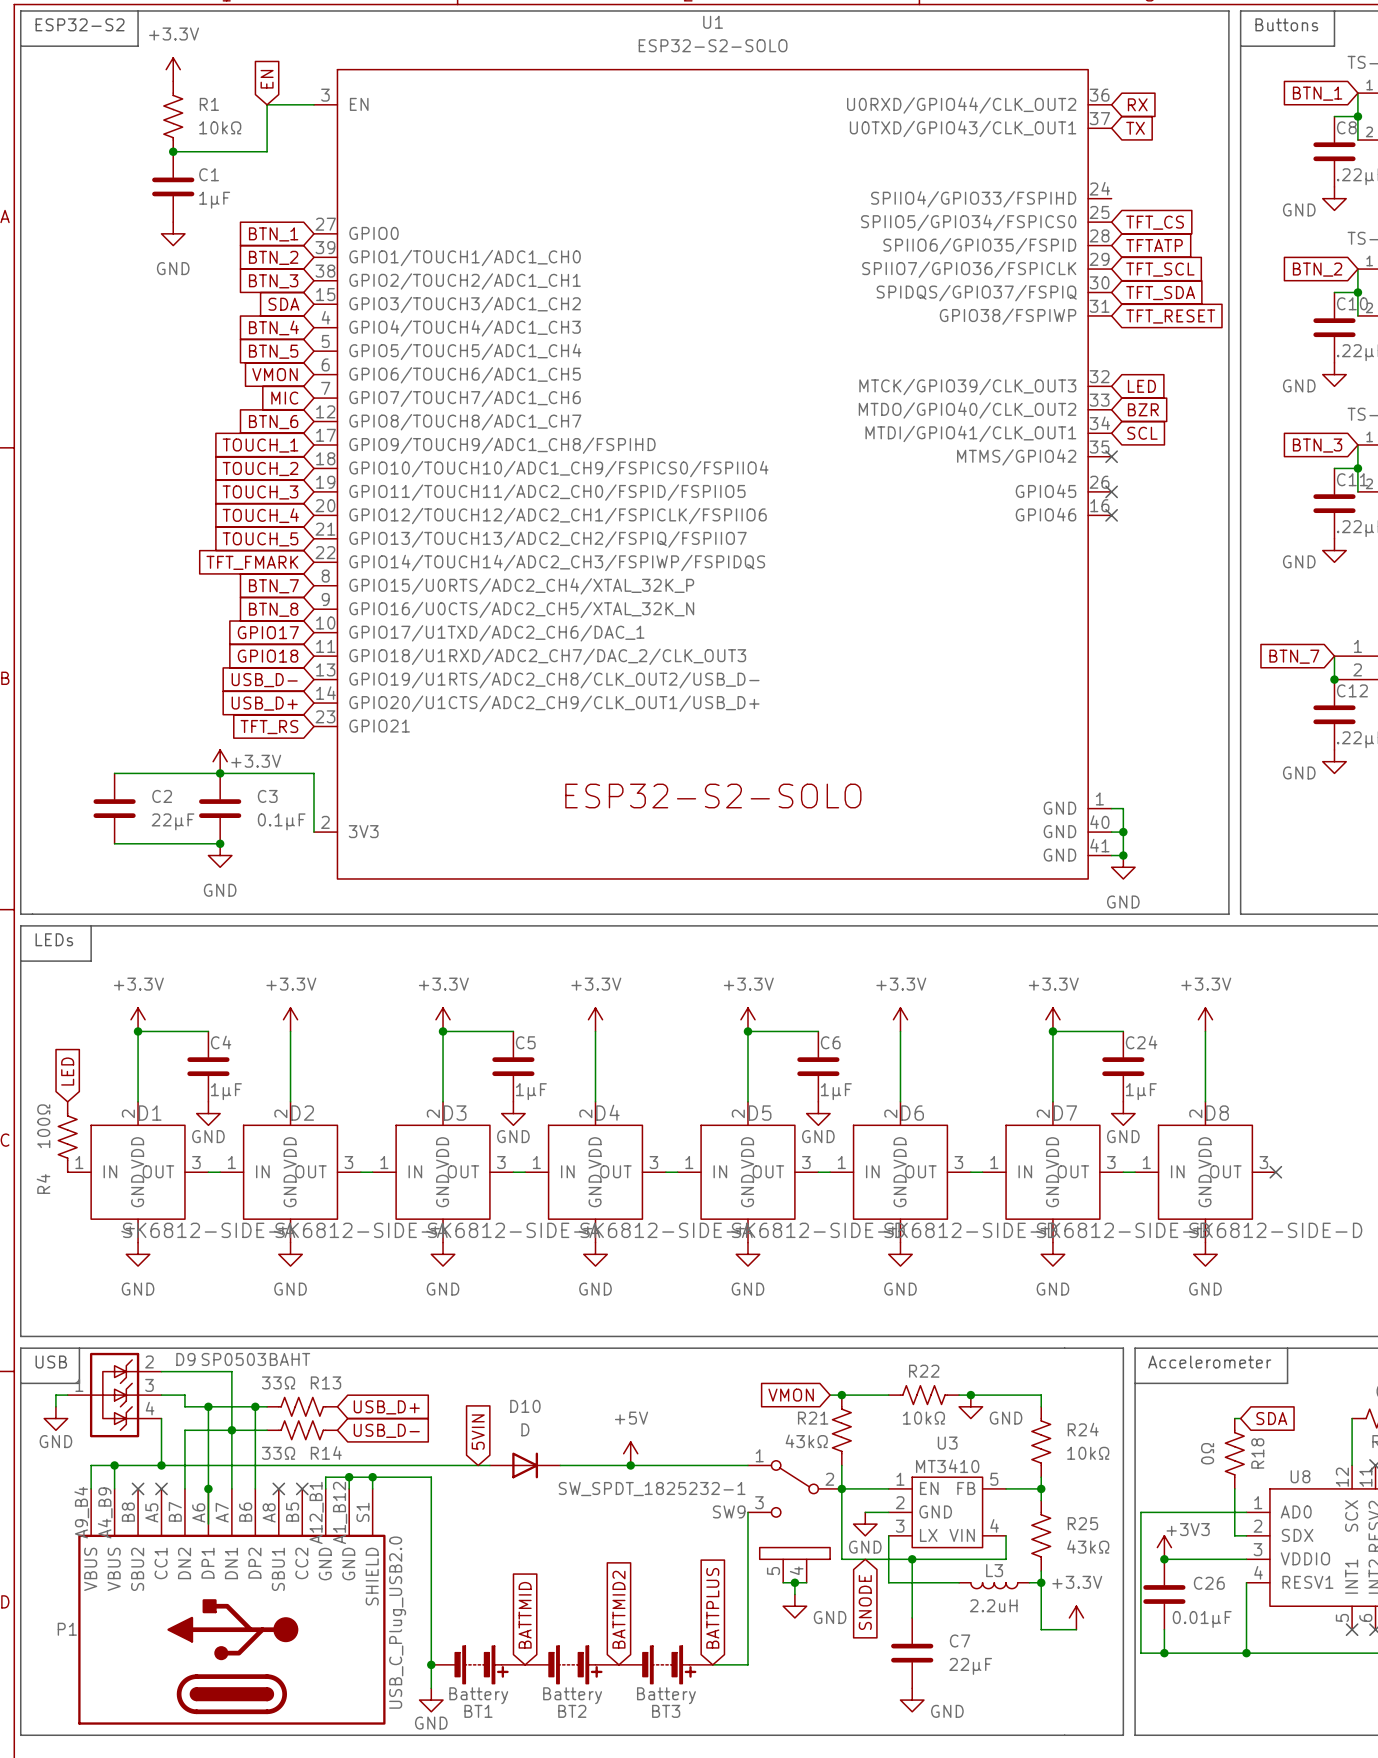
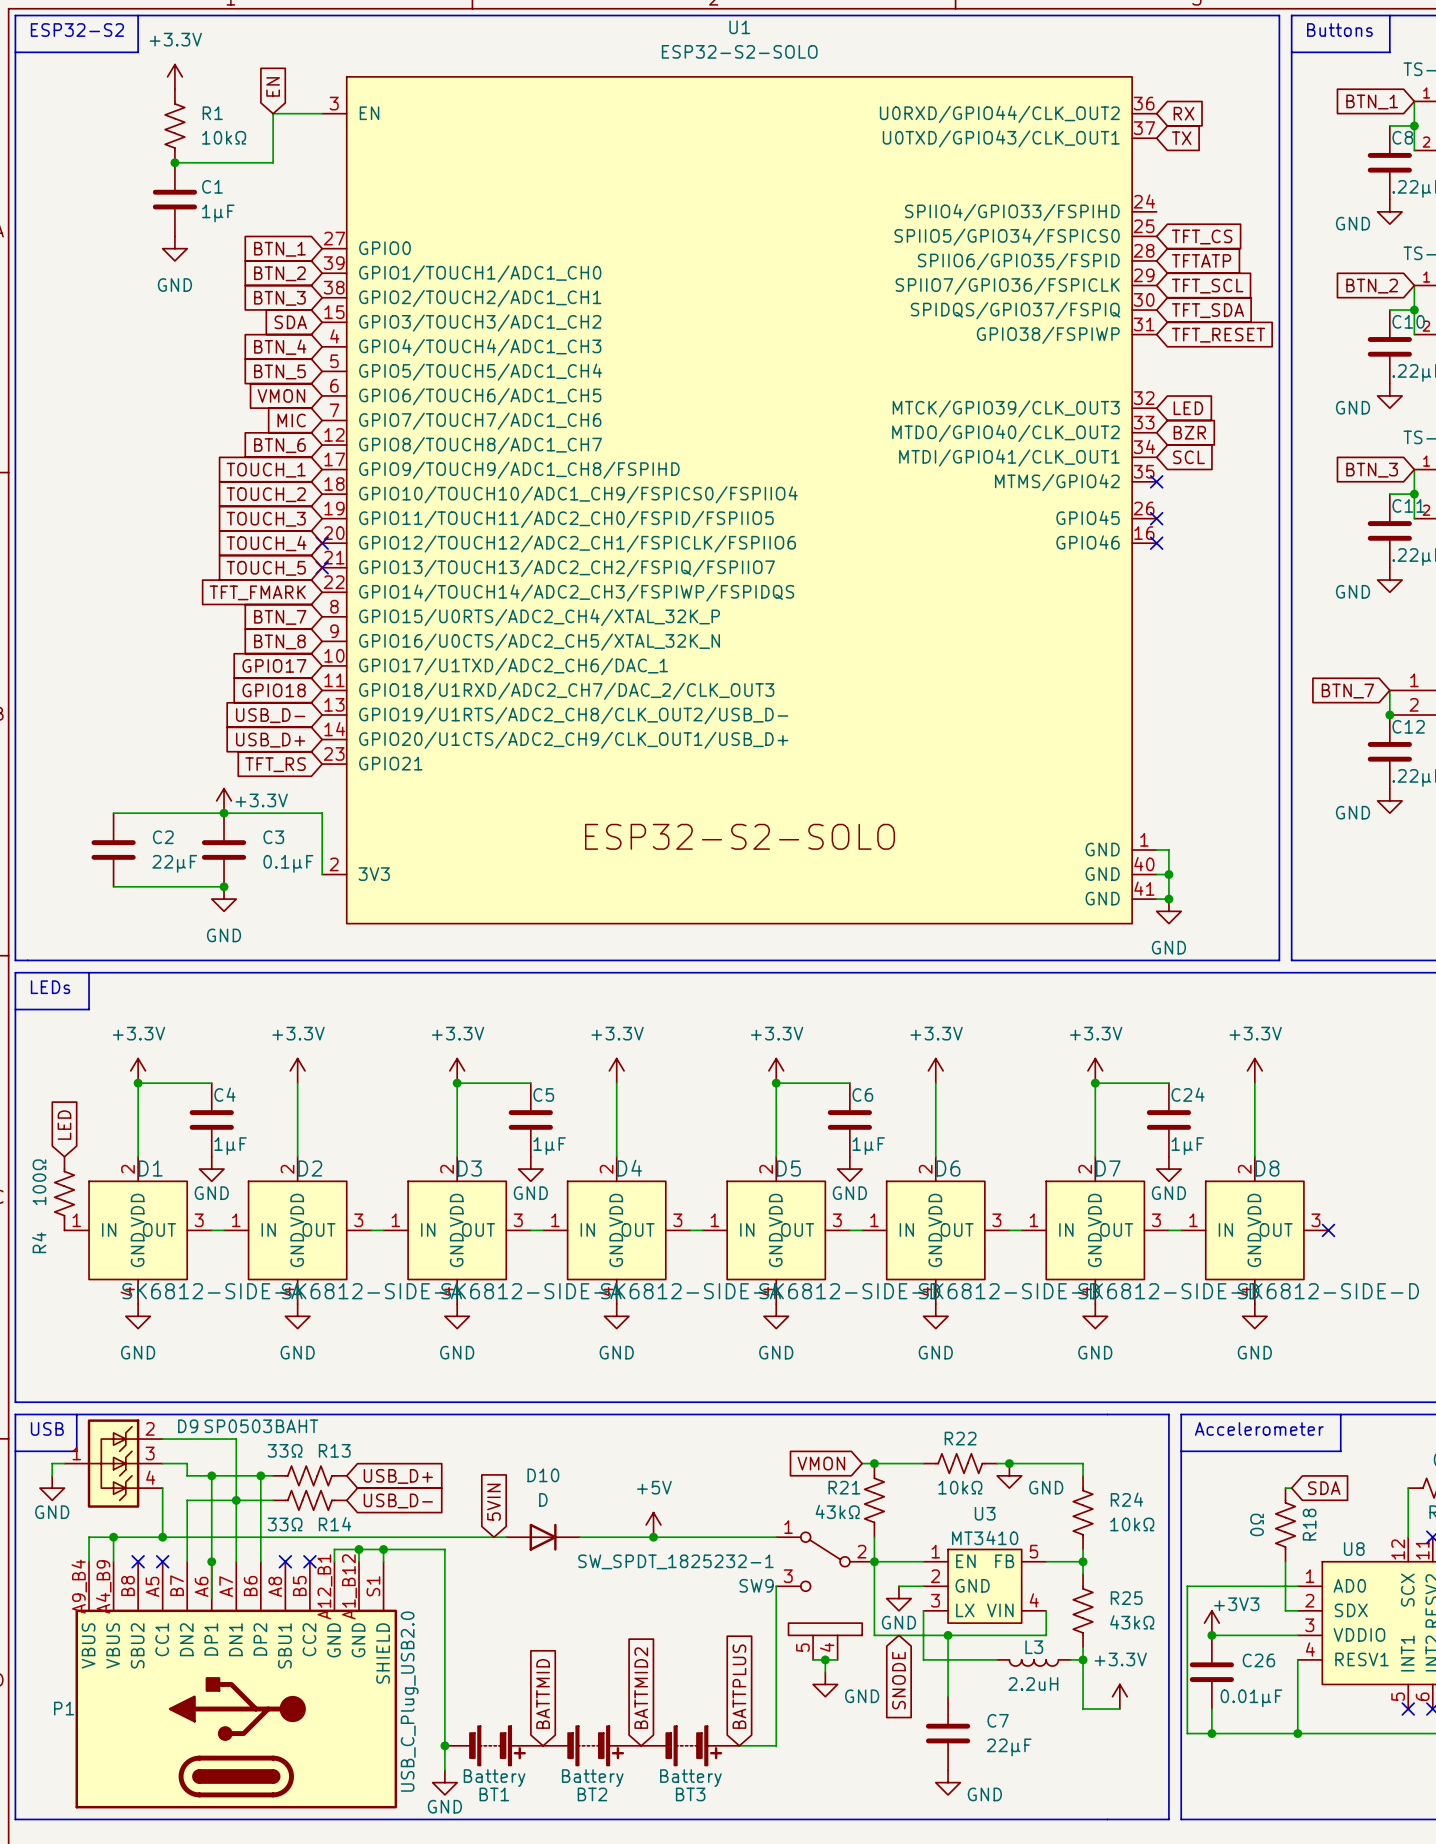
no-connect mark: none -> (322, 543)
no-connect mark: none -> (322, 567)

